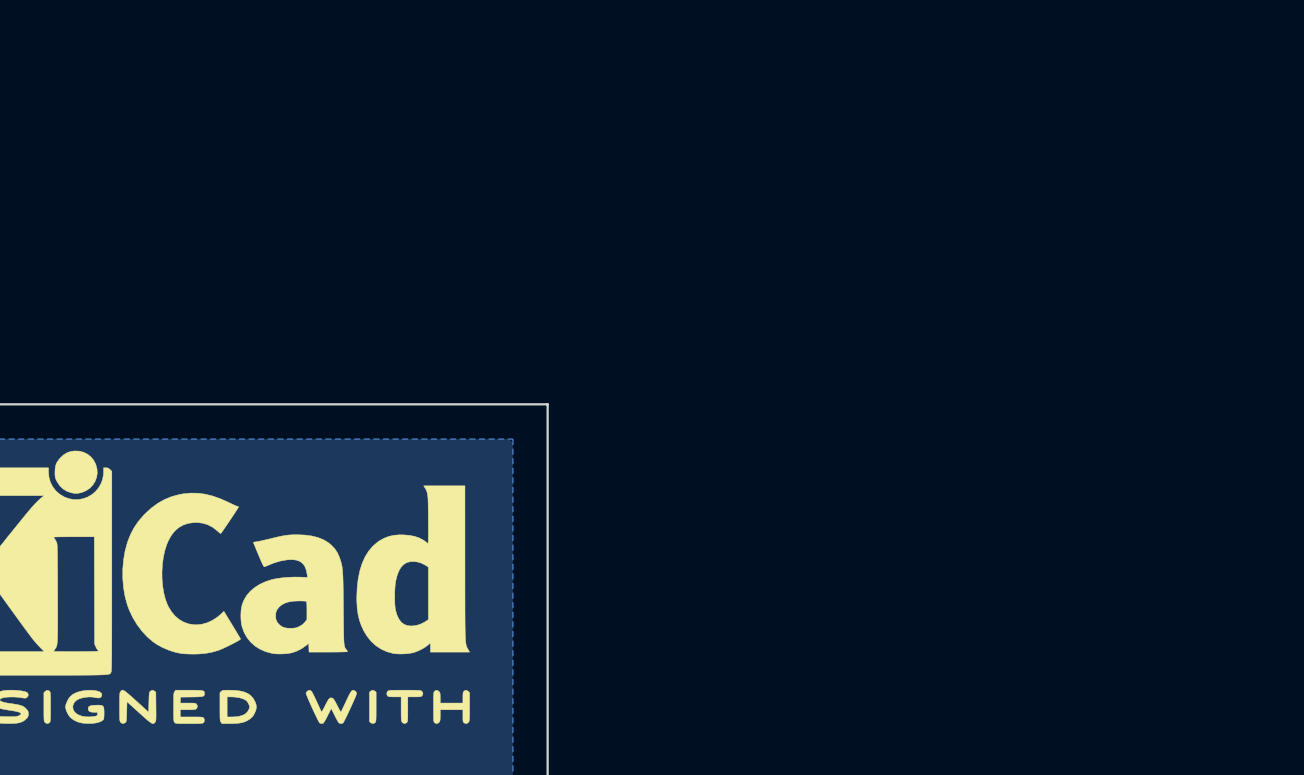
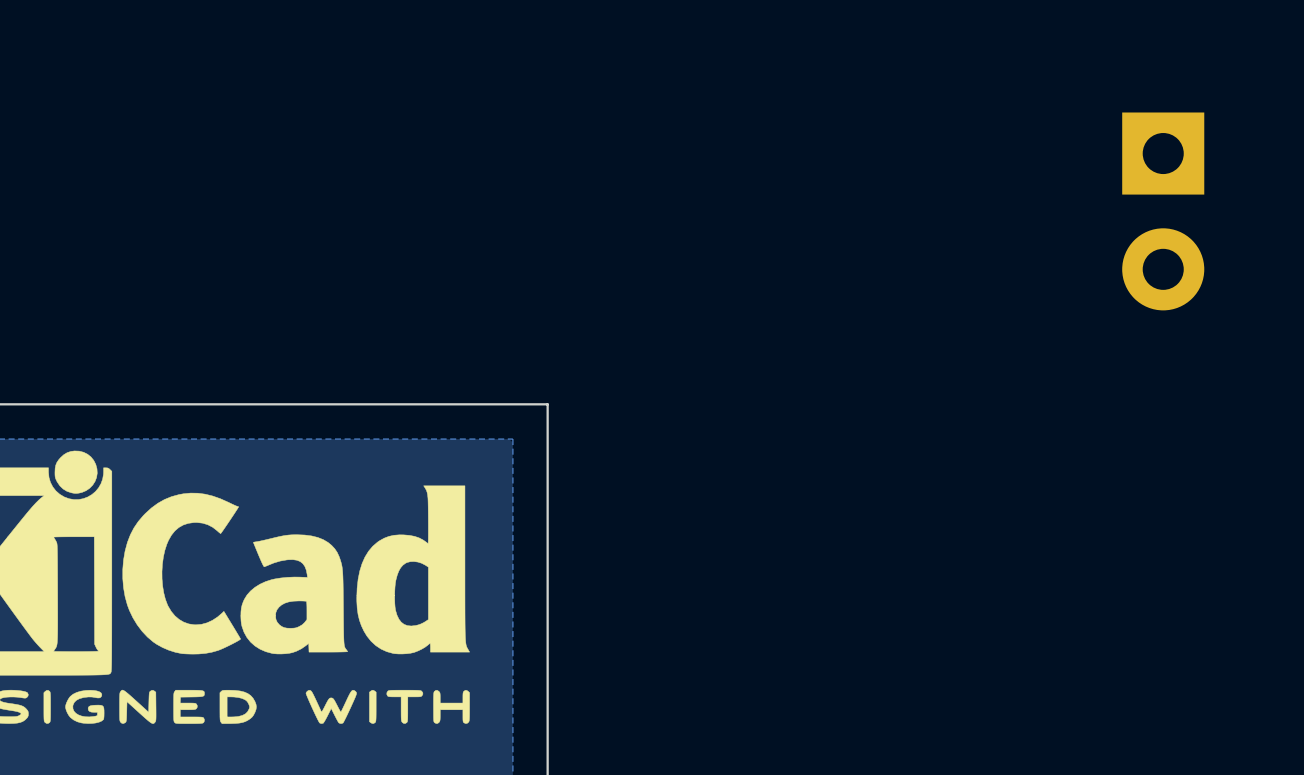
part: none -> (1163, 211)

